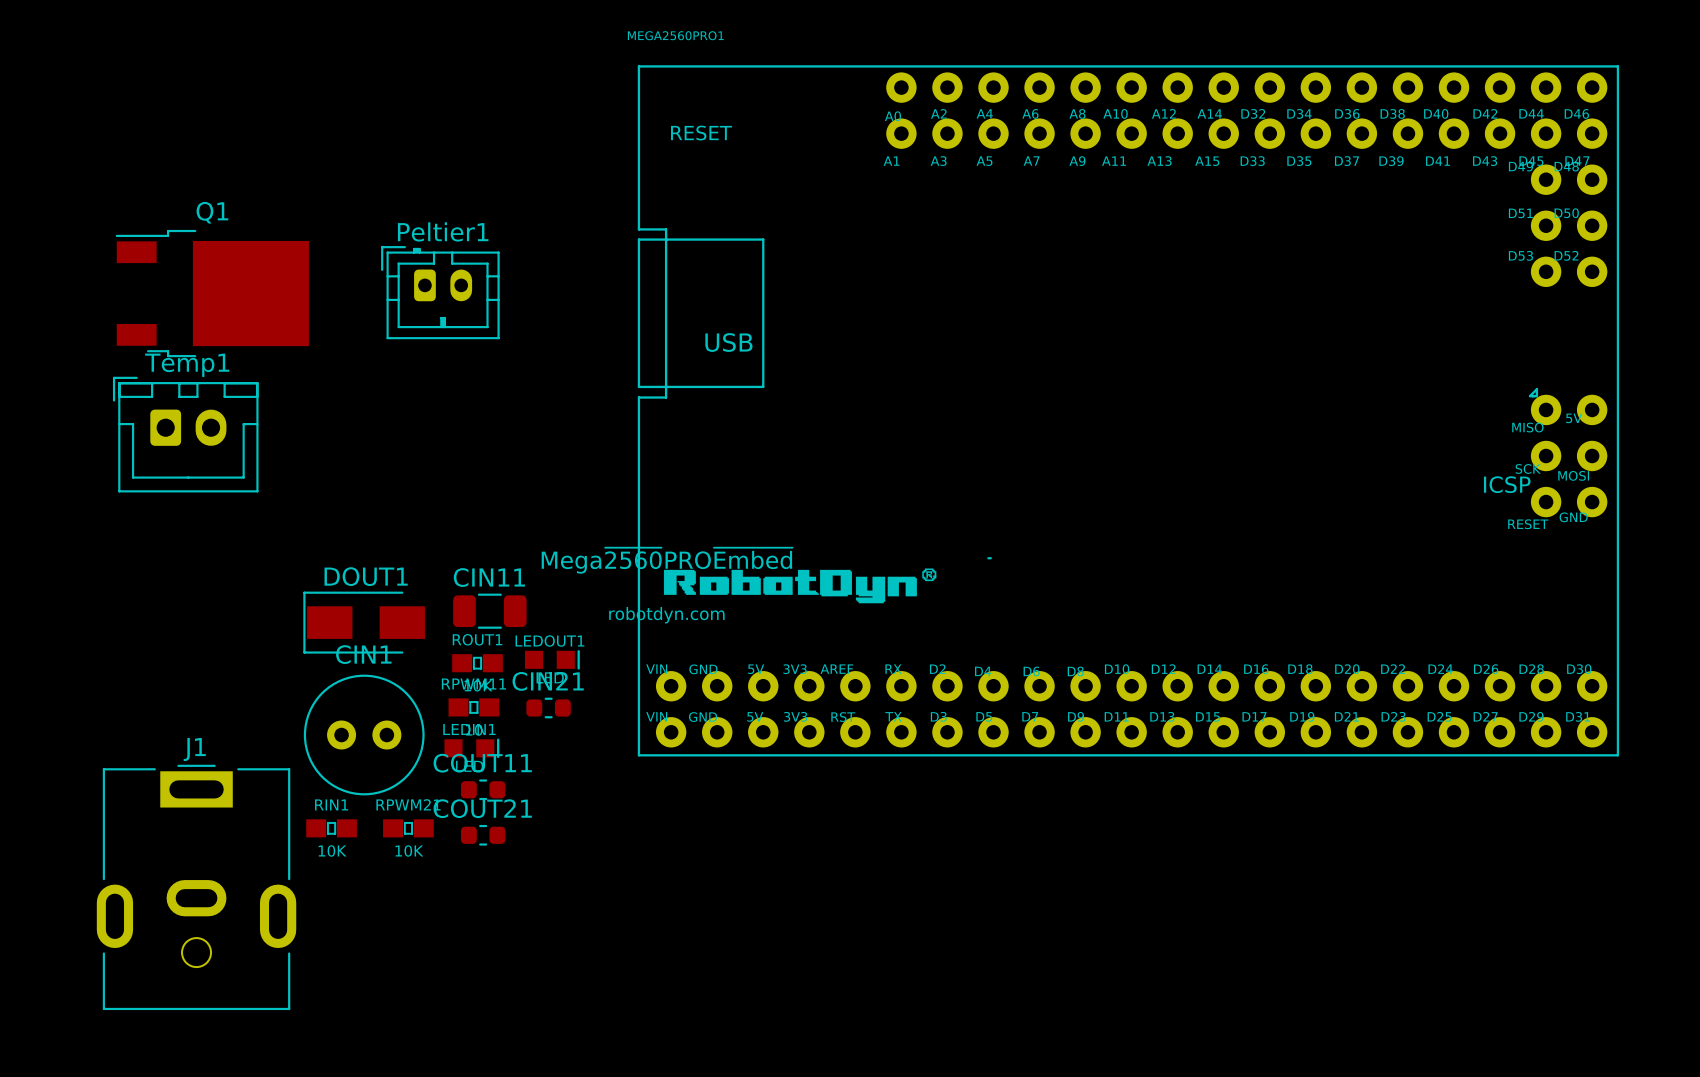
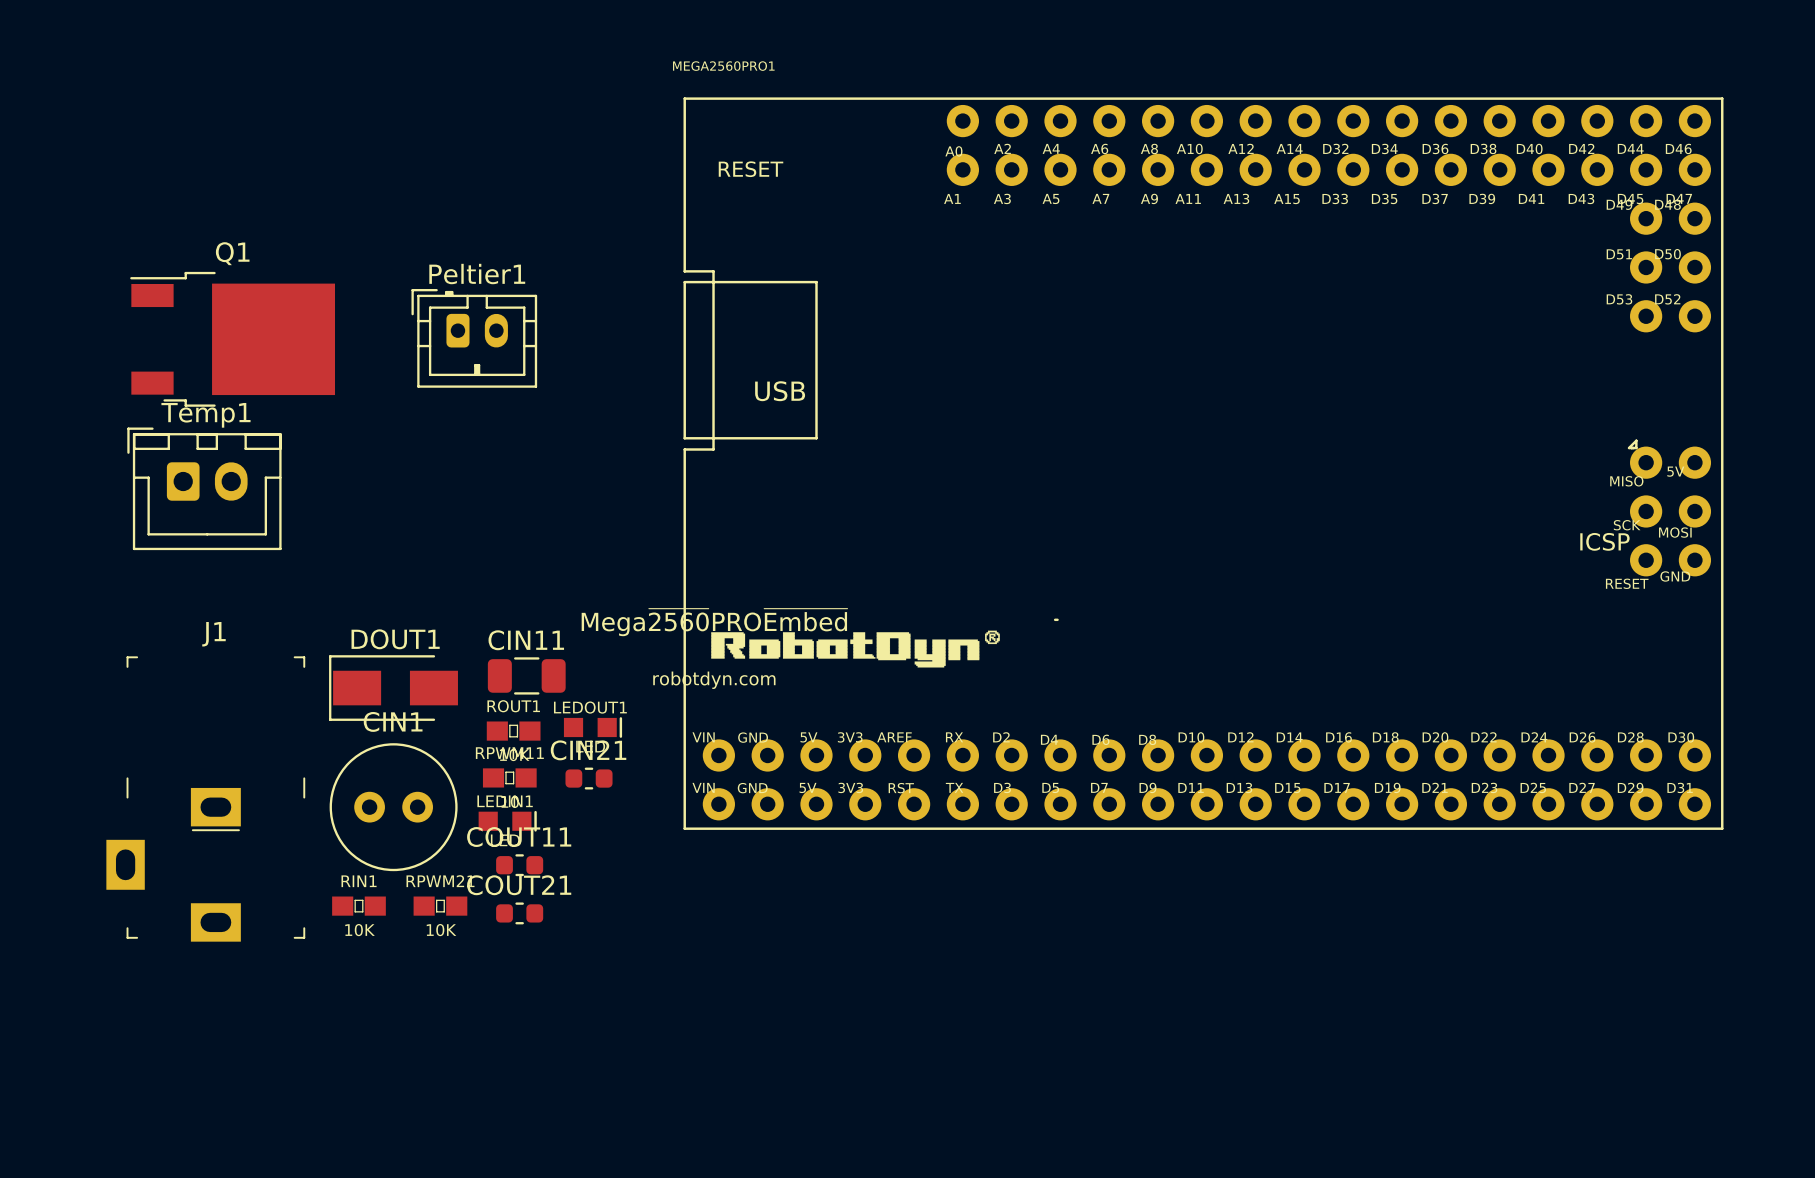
J1 footprint: [96, 764, 297, 1011] -> [106, 656, 306, 942]

